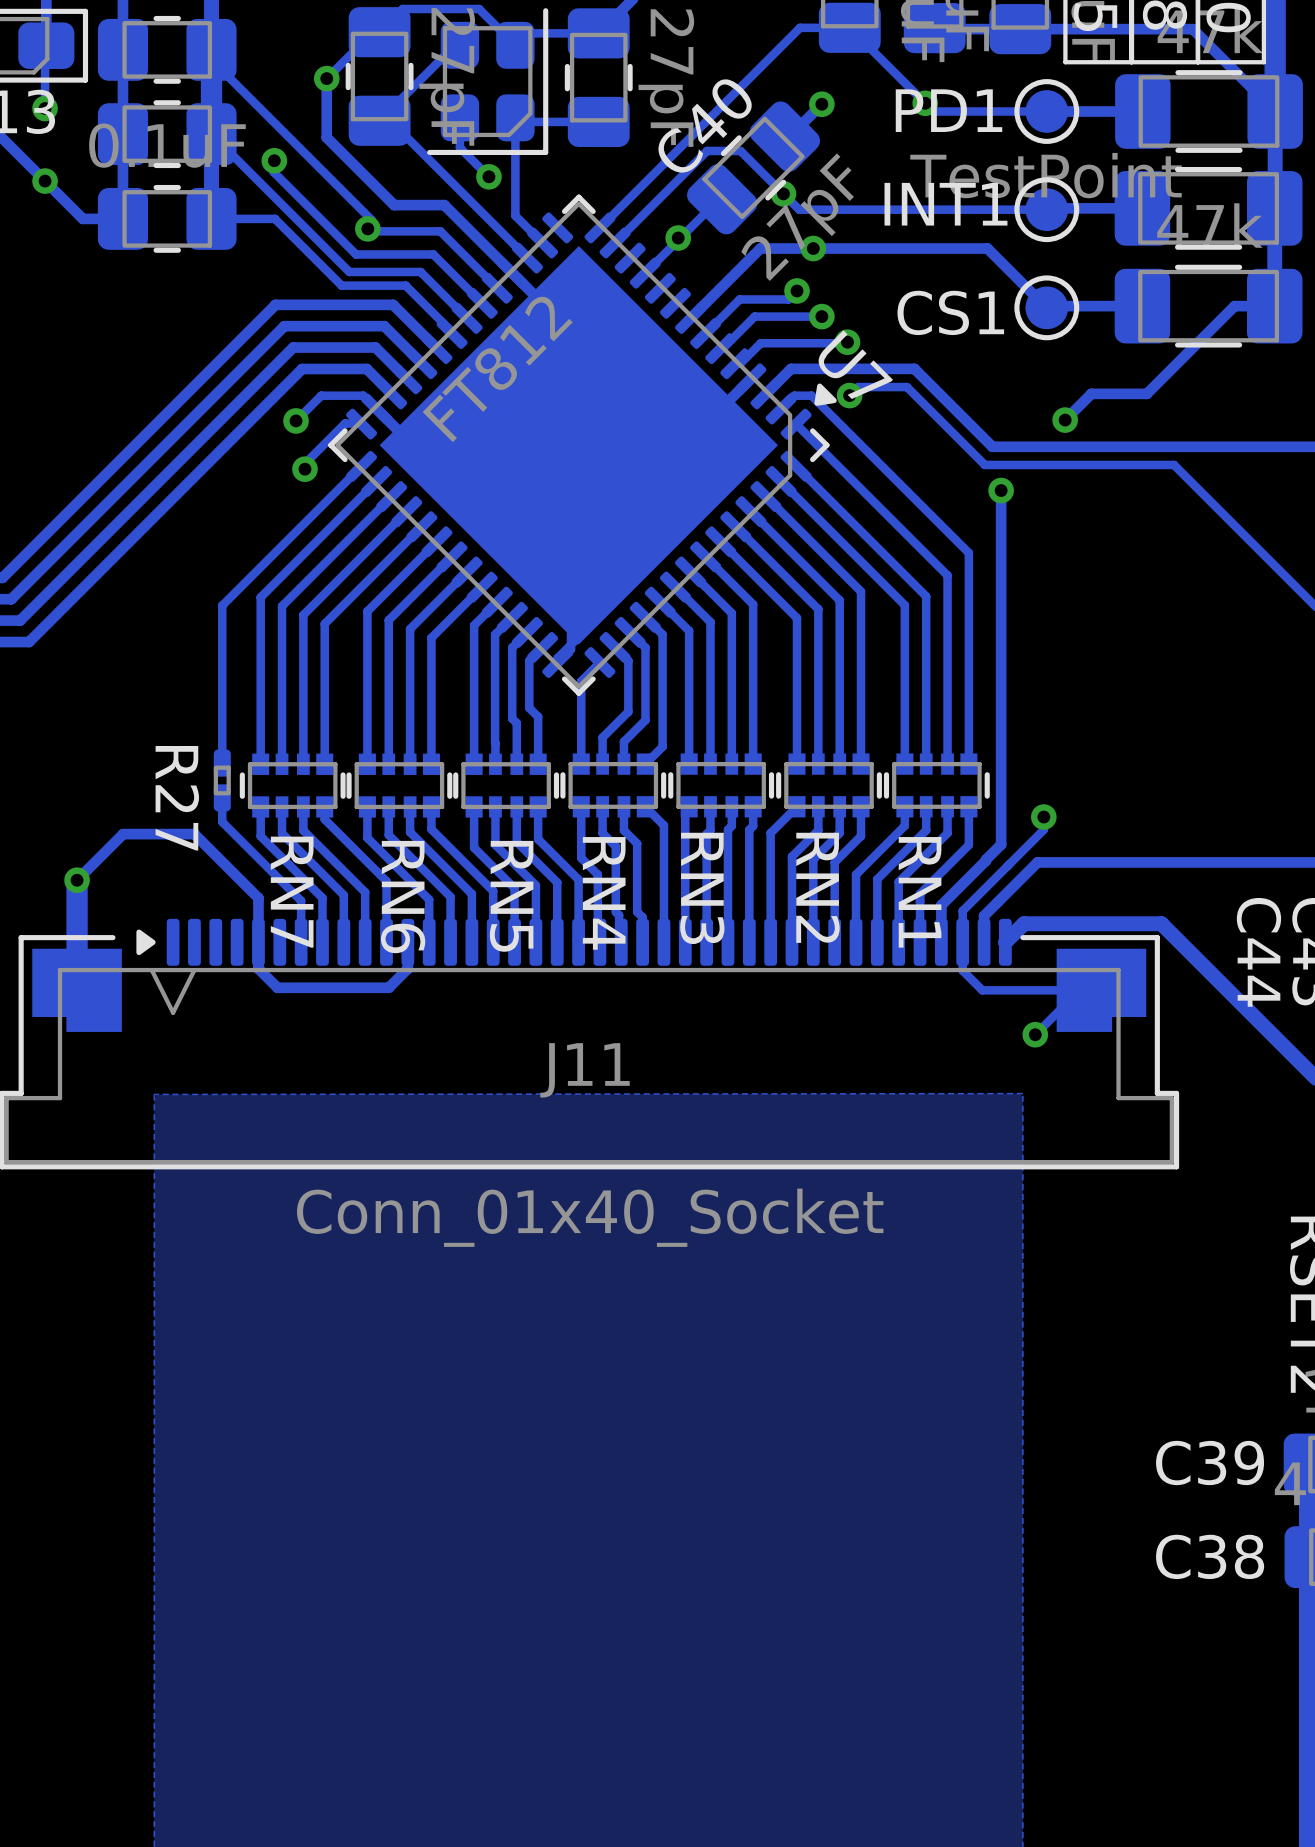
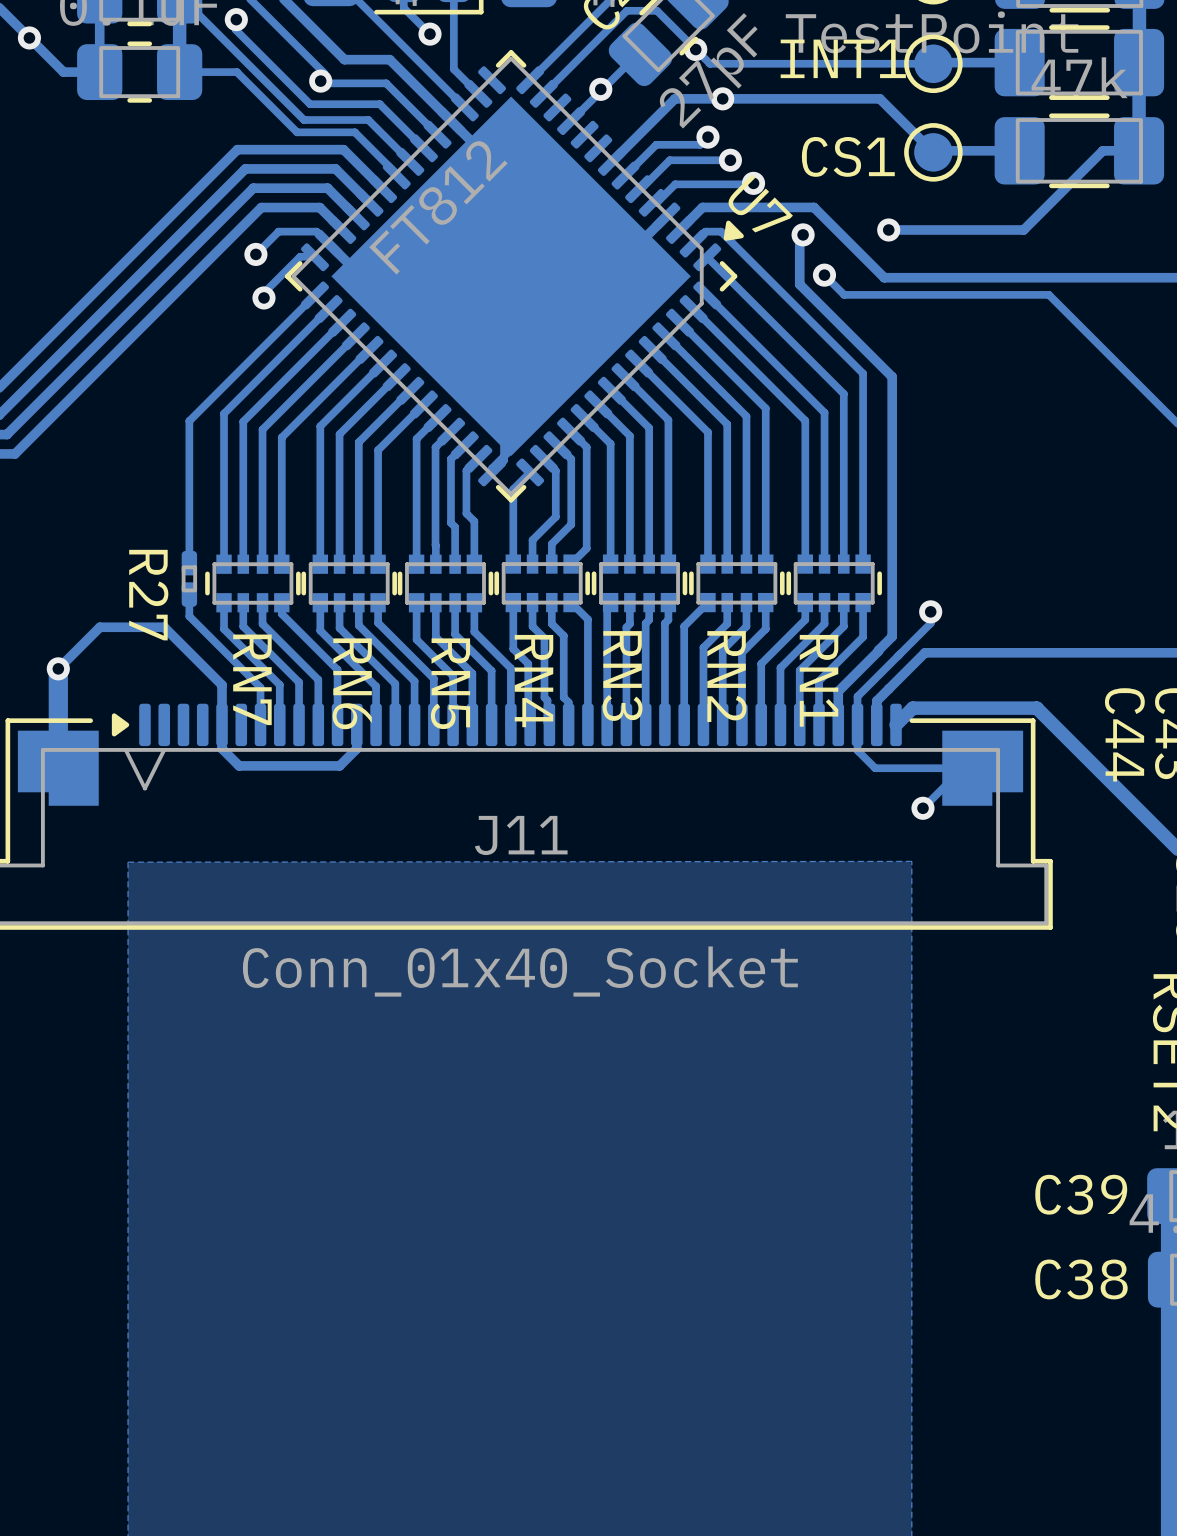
via: none -> (888, 229)
track: (1091, 393) (1065, 420) -> (973, 229) (888, 229)
track: (849, 395) (858, 387) (906, 387) (984, 464) (1174, 465) -> (824, 275) (844, 294) (1048, 294)
via: (849, 395) -> none
via: none -> (803, 234)
via: (1065, 420) -> none
via: none -> (824, 275)
track: (1001, 490) (1001, 556) -> (803, 234) (799, 238) (799, 284) (892, 376)
via: (1001, 490) -> none

